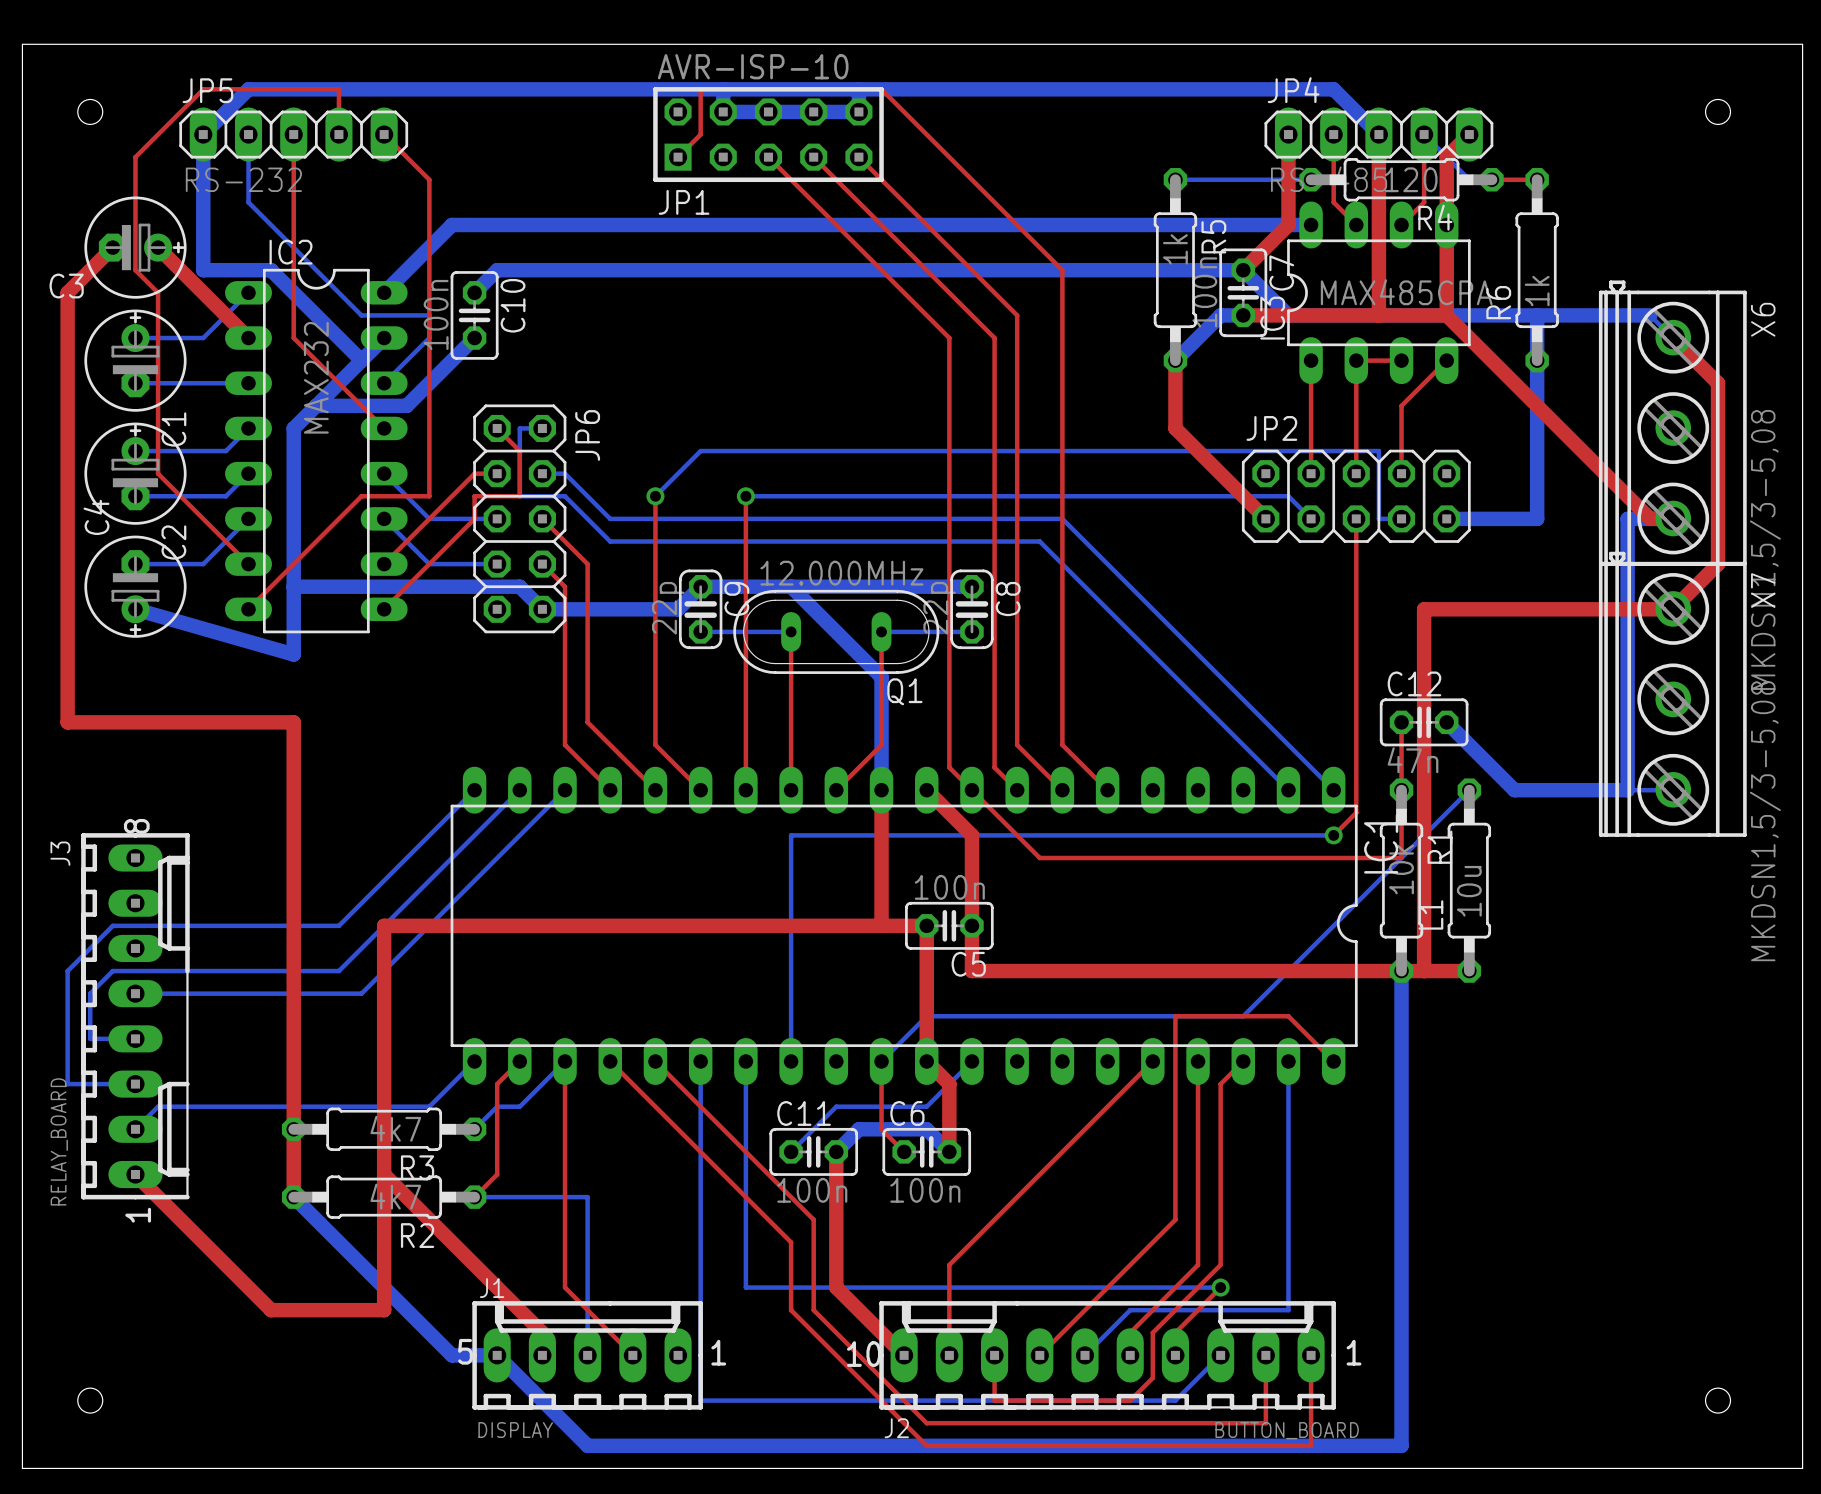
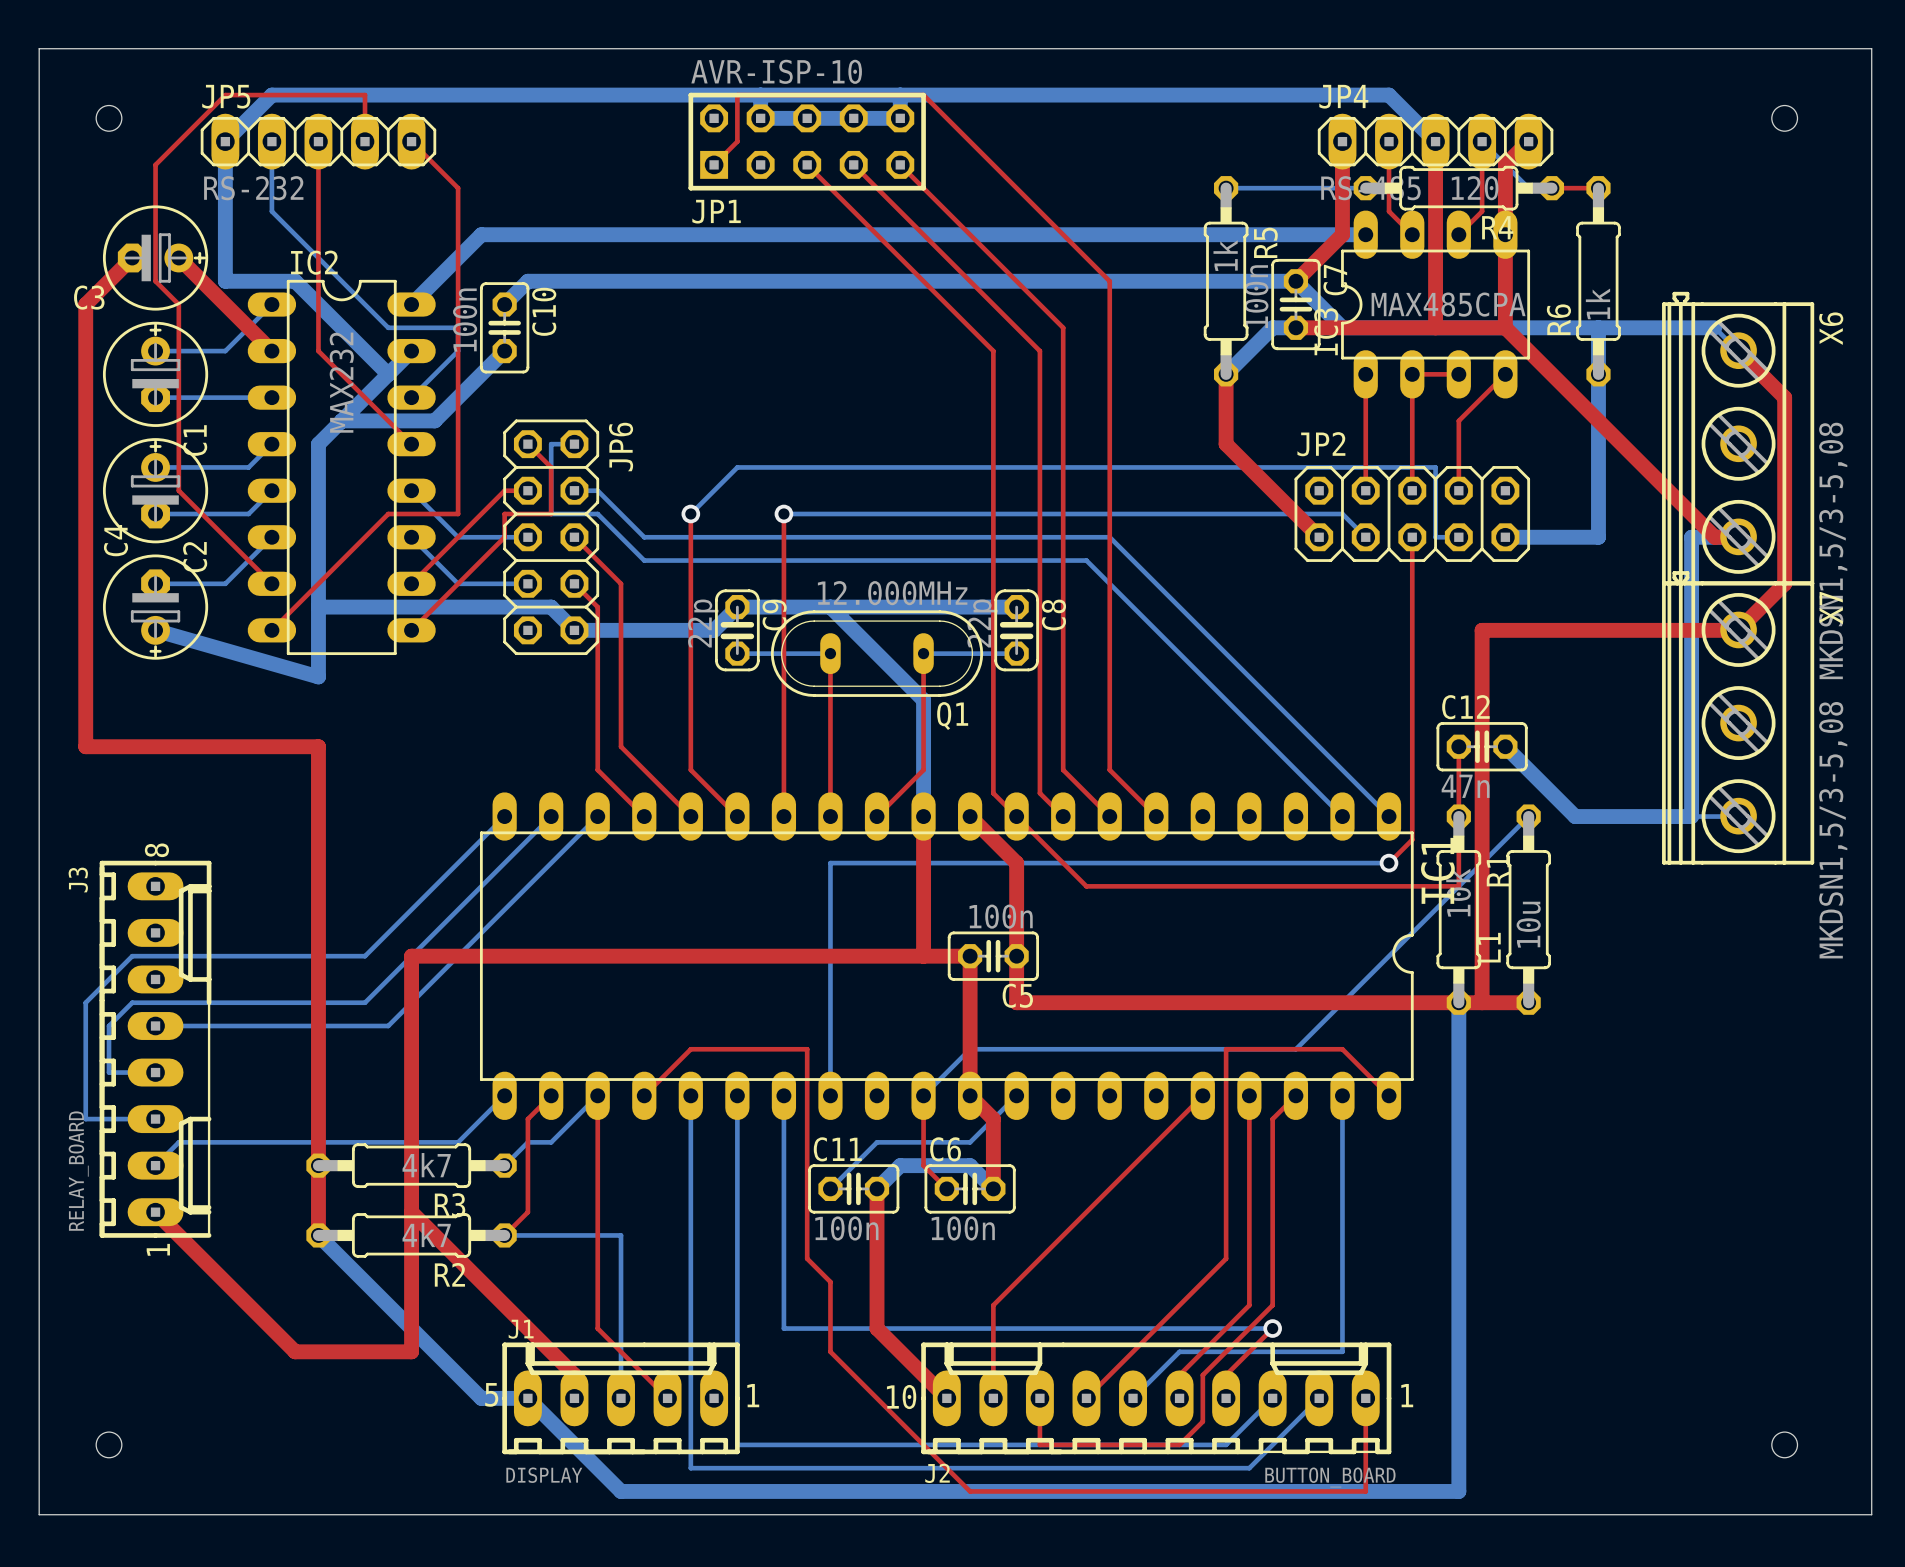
top track: (610, 1061) (768, 1219) -> (644, 1095) (690, 1049) (807, 1049) (807, 1258)
bottom track: none -> (690, 1095) (690, 1468) (1249, 1468) (1319, 1398)
top track: (655, 1061) (813, 1219) (813, 1310) (926, 1423) (1265, 1423) (1265, 1355) -> none

